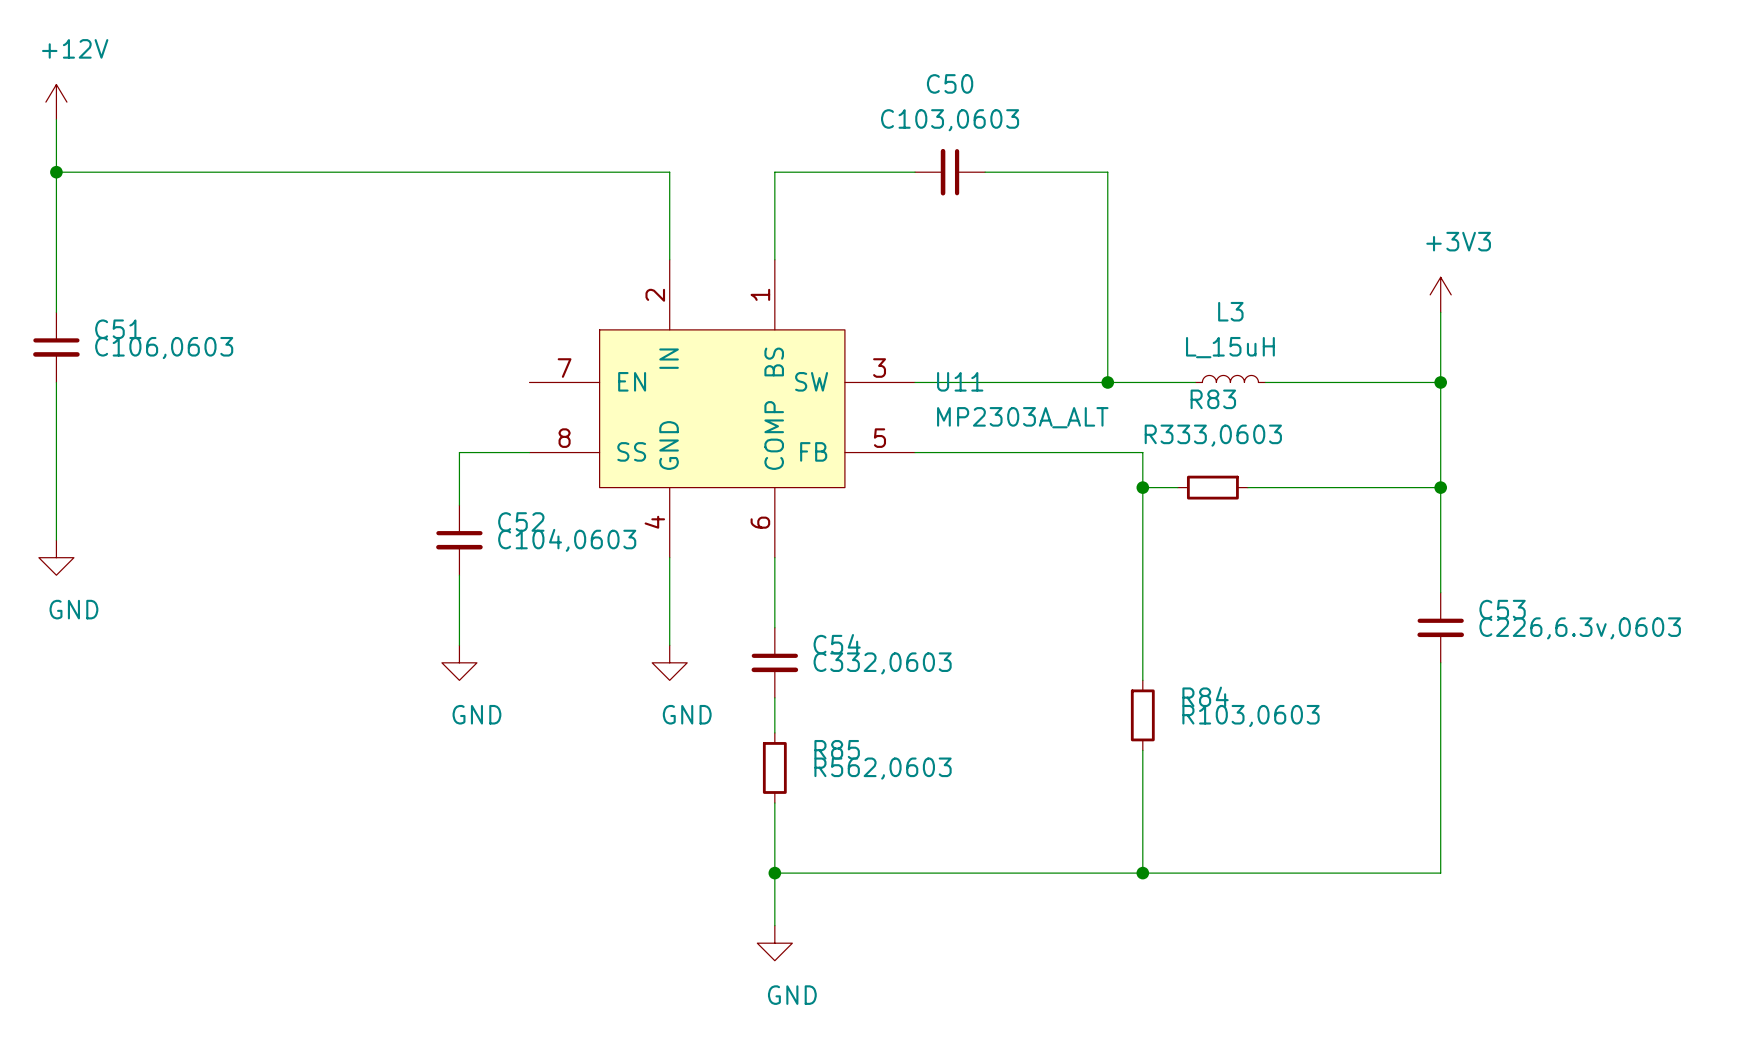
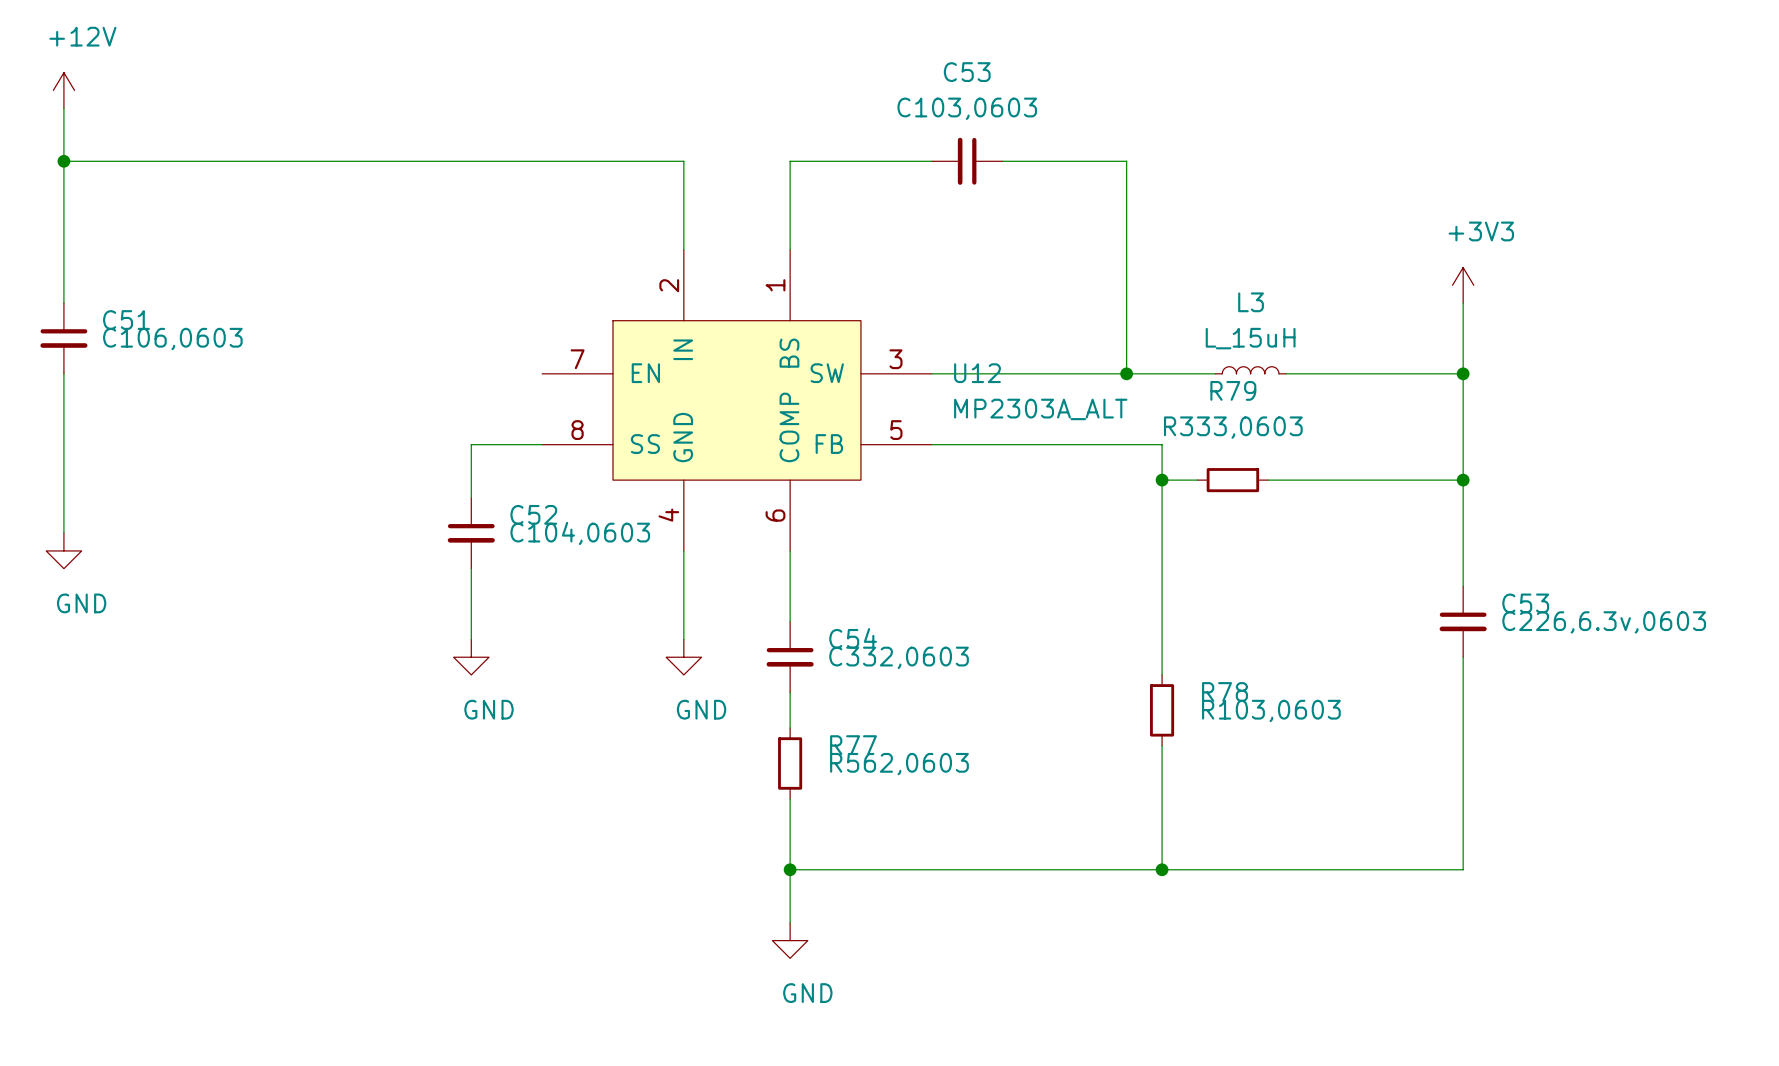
C50 name: C50 (950, 83) -> C53 (967, 72)
U11 name: U11 (960, 381) -> U12 (977, 373)
R83 name: R83 (1213, 399) -> R79 (1233, 390)
R84 name: R84 (1205, 696) -> R78 (1225, 691)
R85 name: R85 (837, 749) -> R77 (853, 745)

